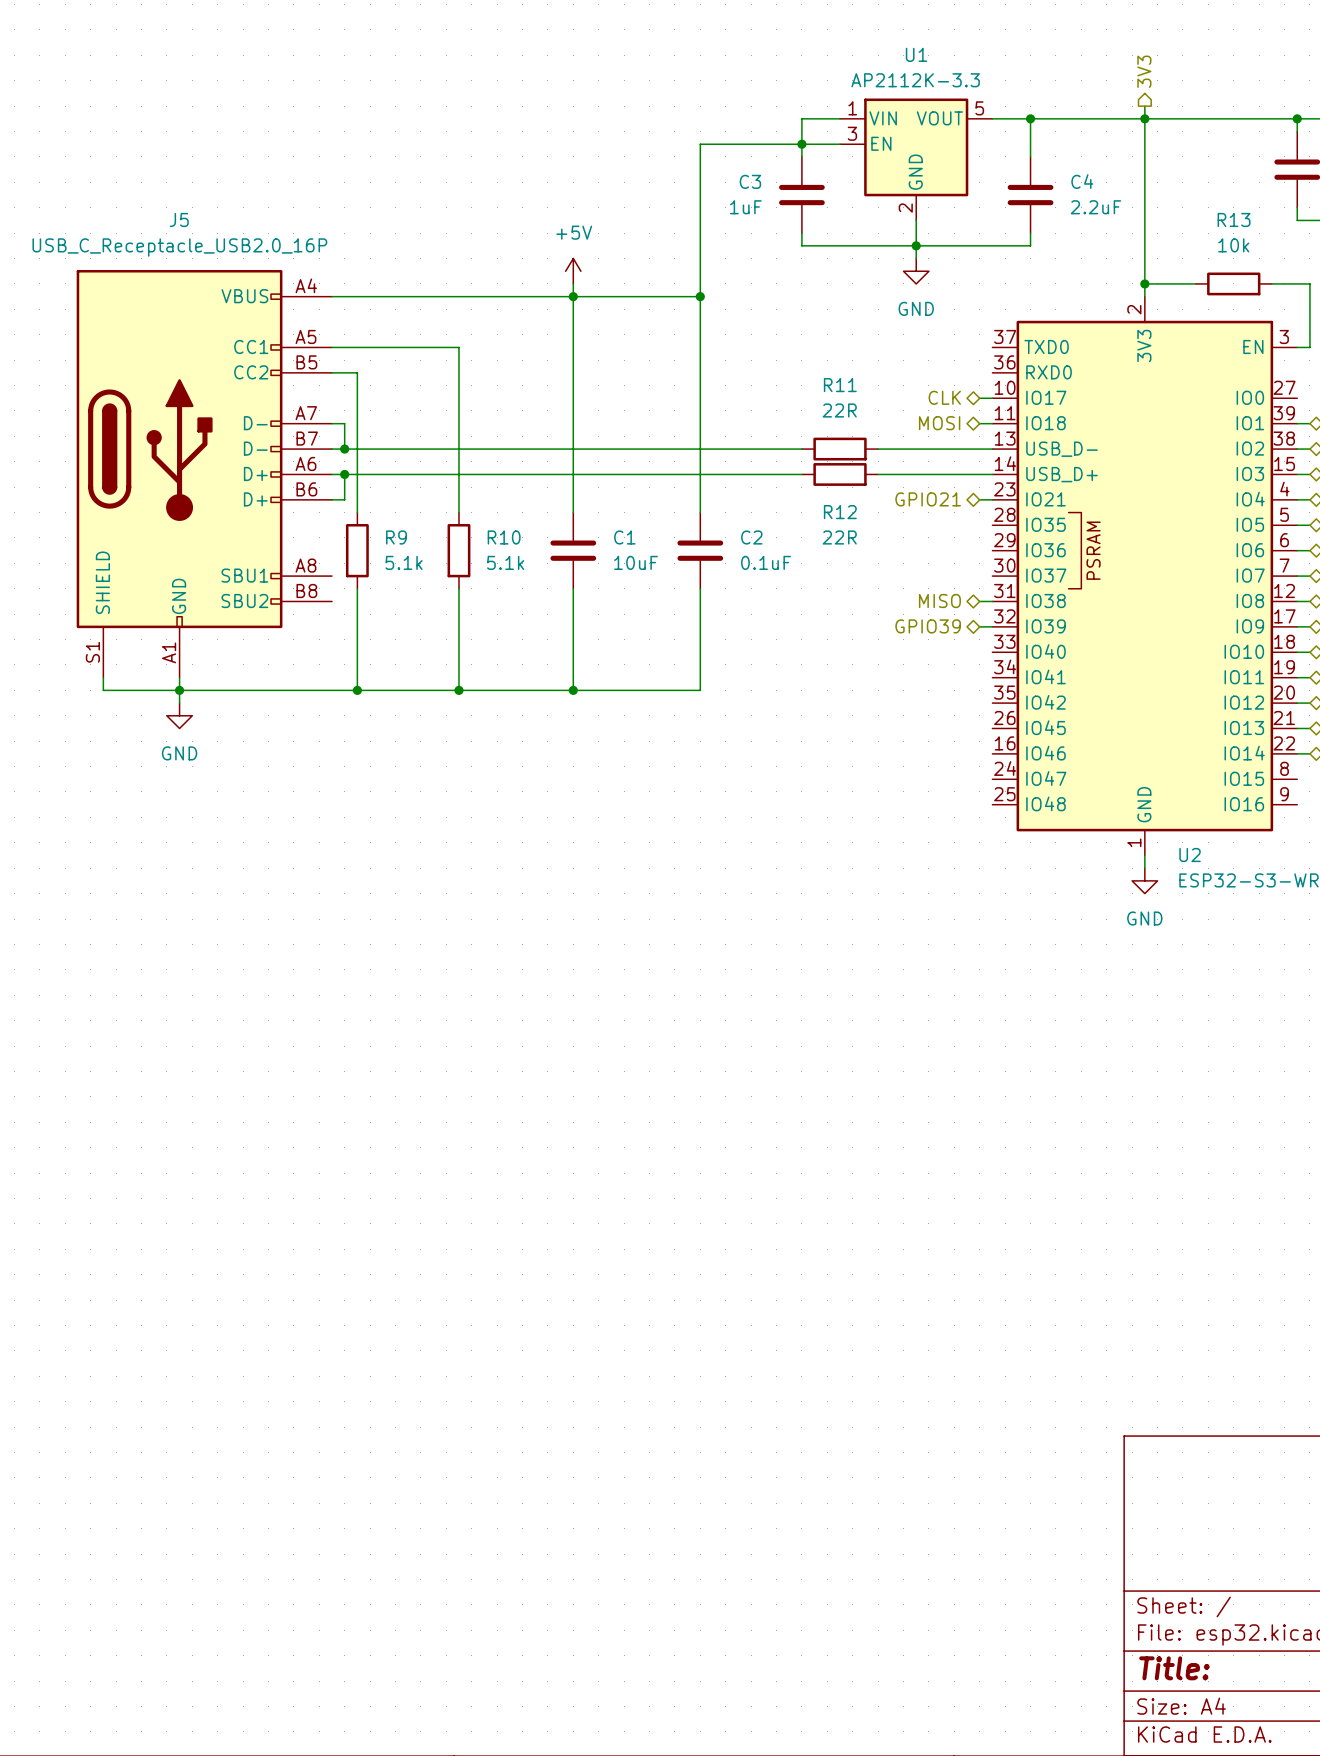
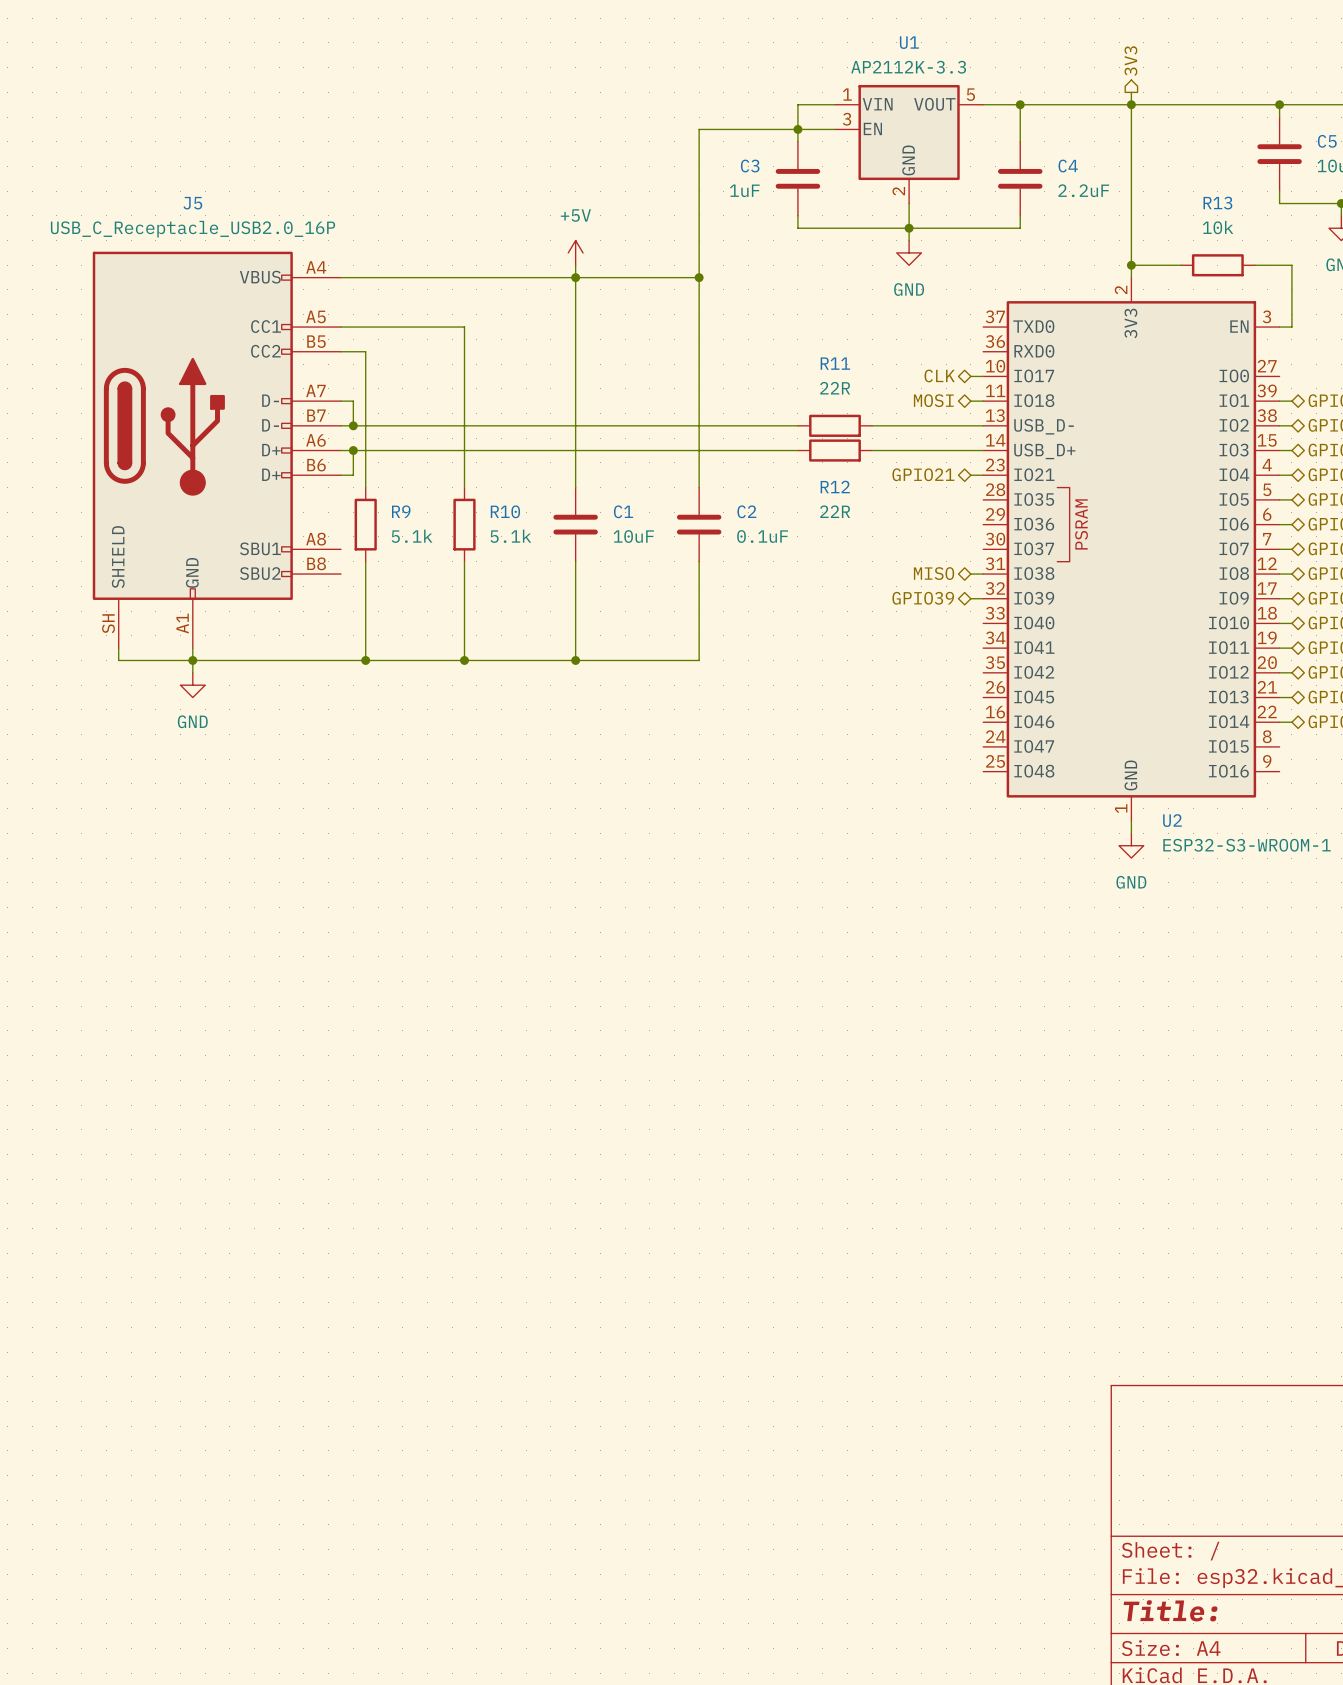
J5 pin number: S1 (92, 652) -> SH (108, 623)

